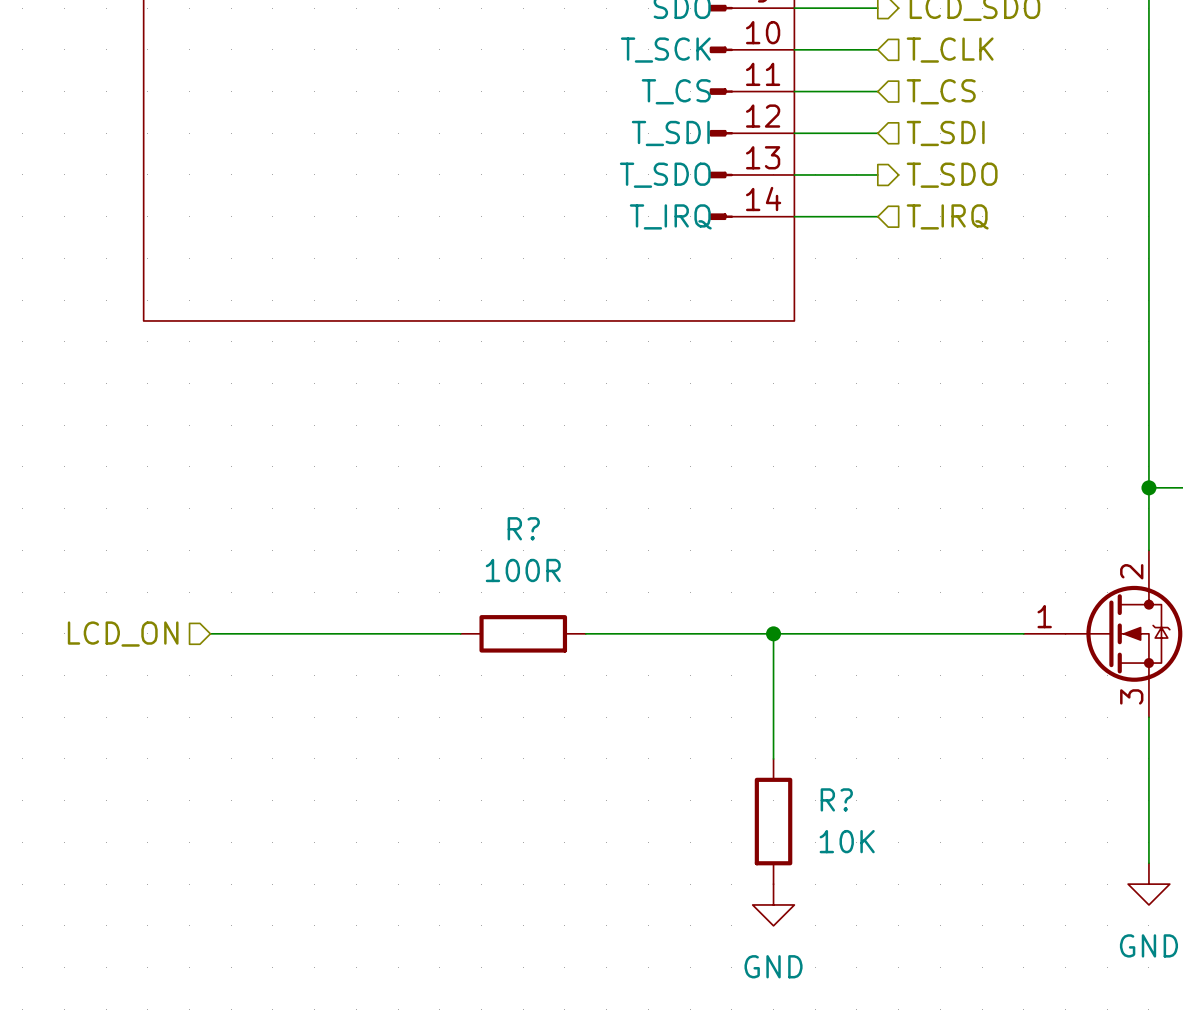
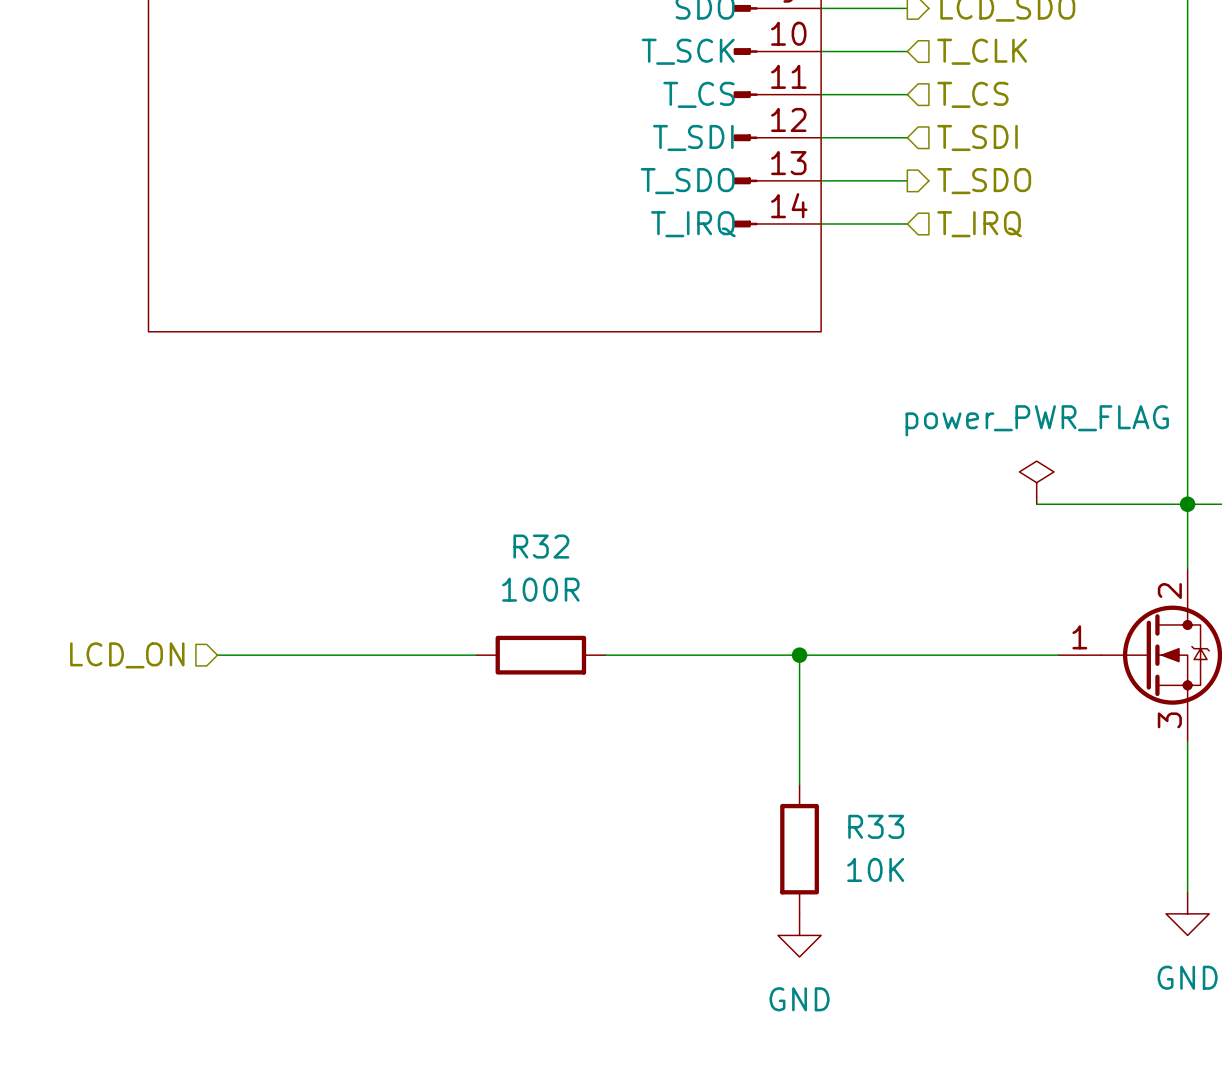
power symbol: none -> power_PWR_FLAG (1036, 482)
wire: none -> (1036, 504) (1187, 504)
R? name: R? (523, 528) -> R32 (541, 546)
R? name: R? (836, 799) -> R33 (876, 826)

